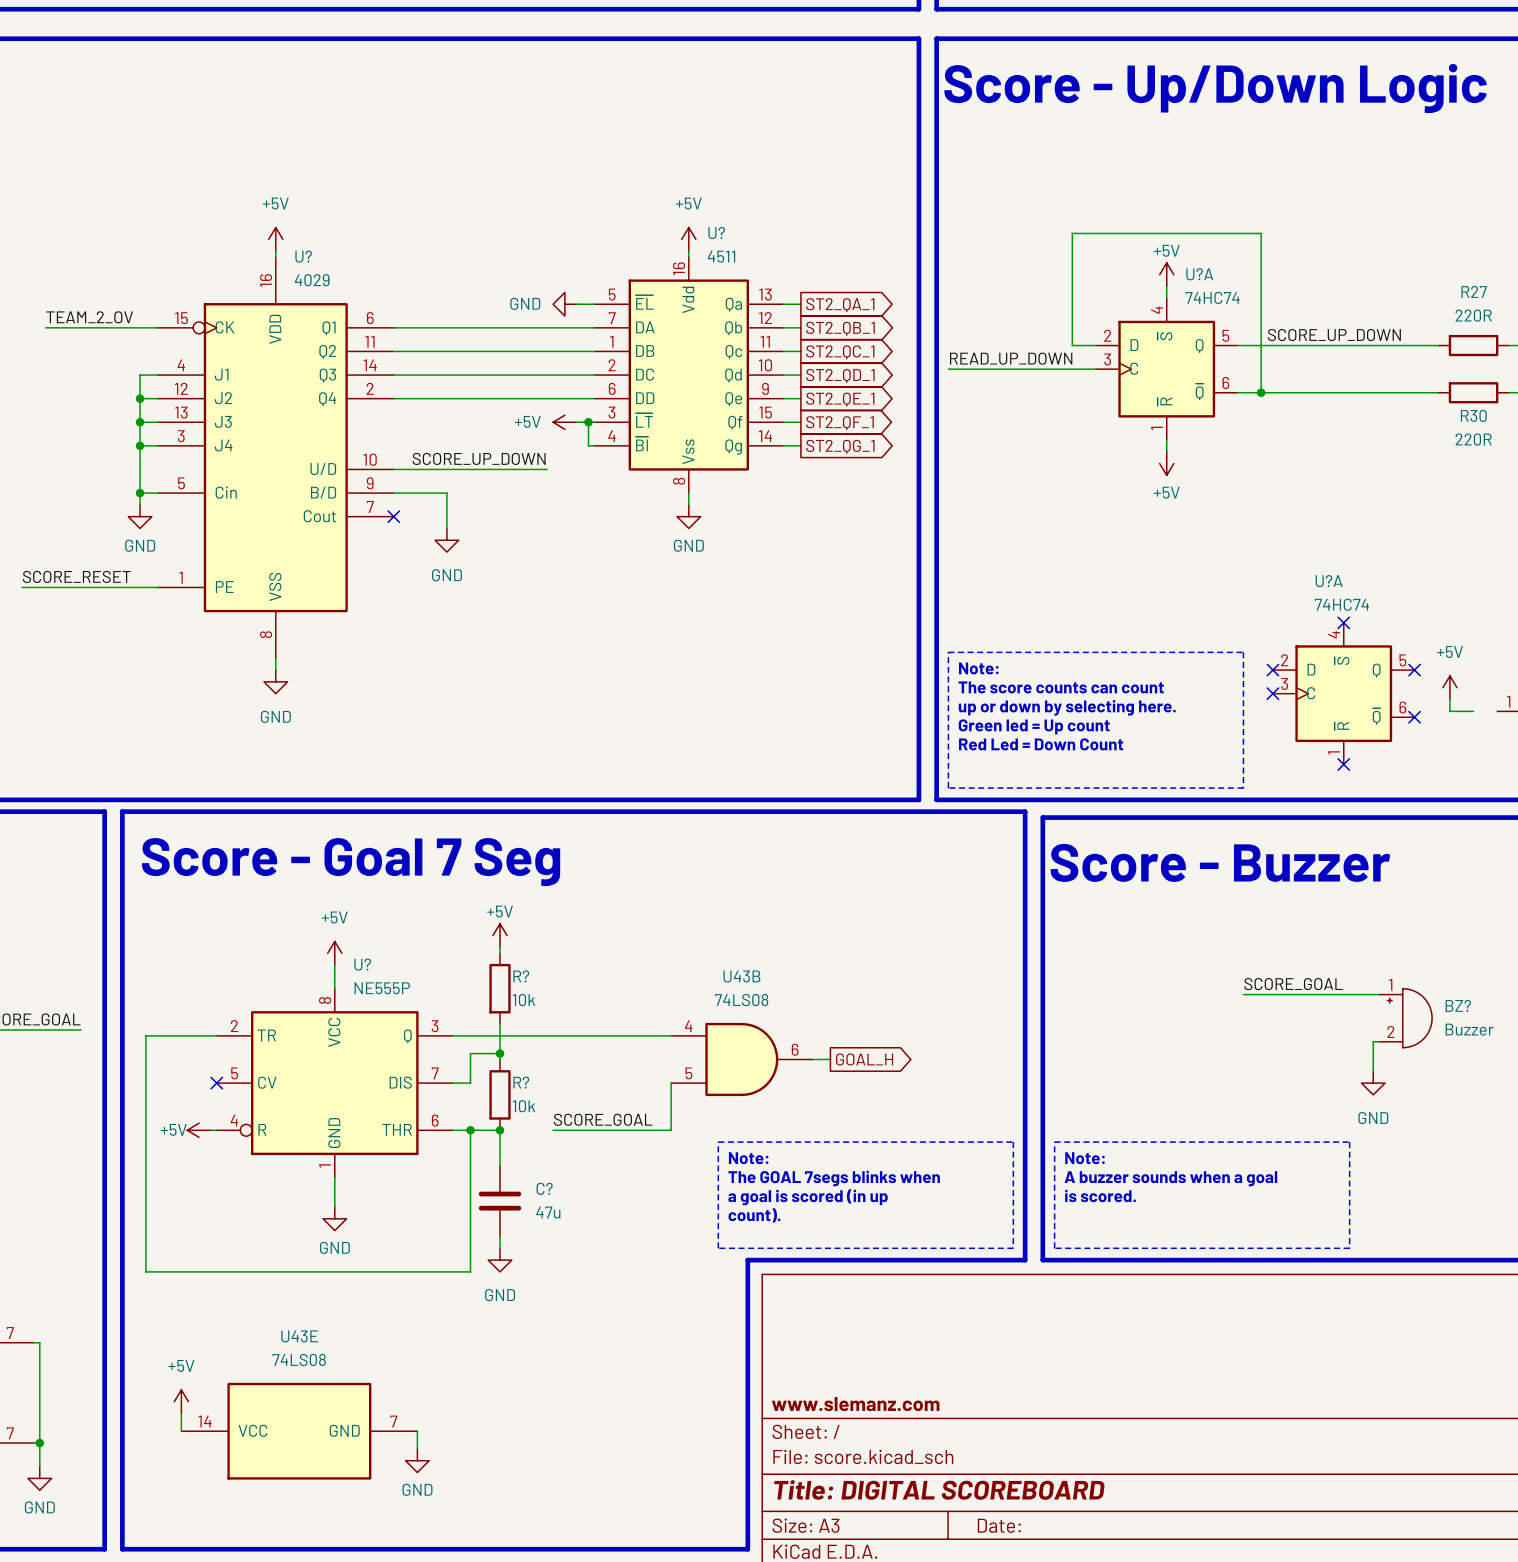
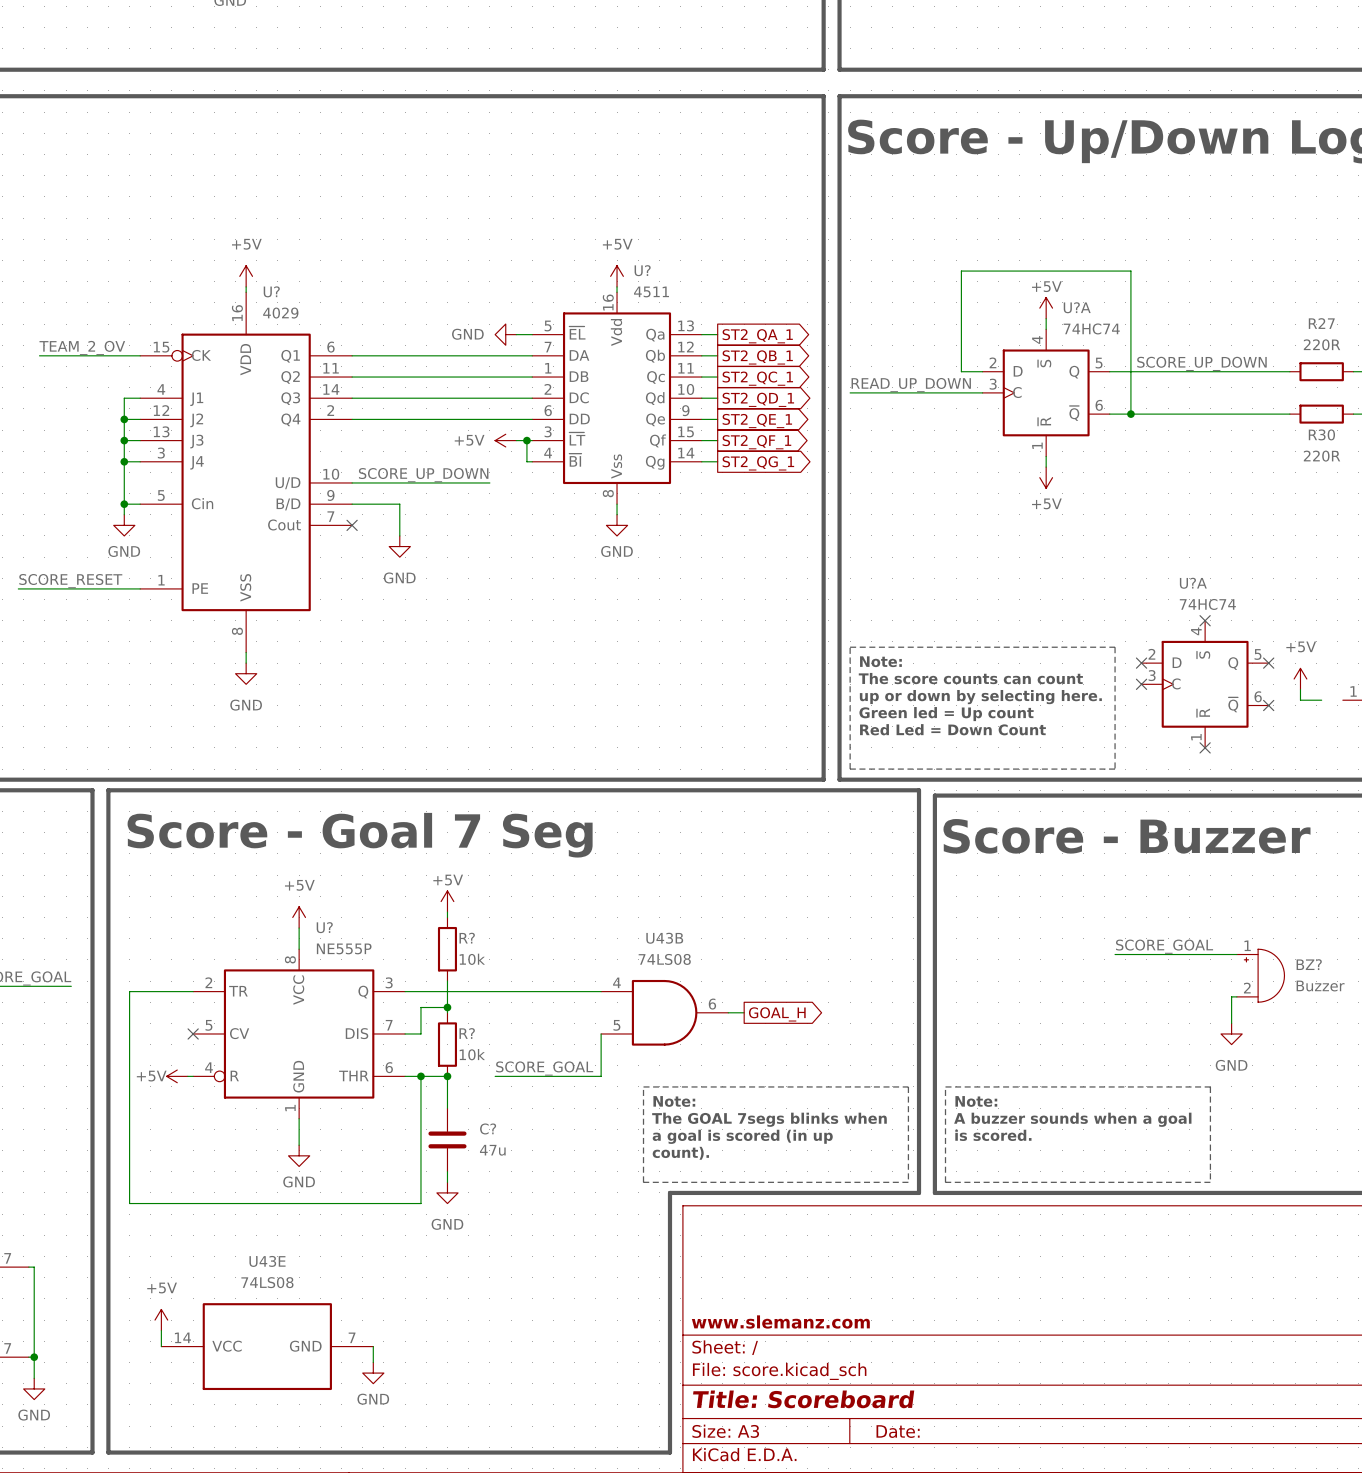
title block: Title: DIGITAL SCOREBOARD (939, 1489) -> Title: Scoreboard (803, 1399)

